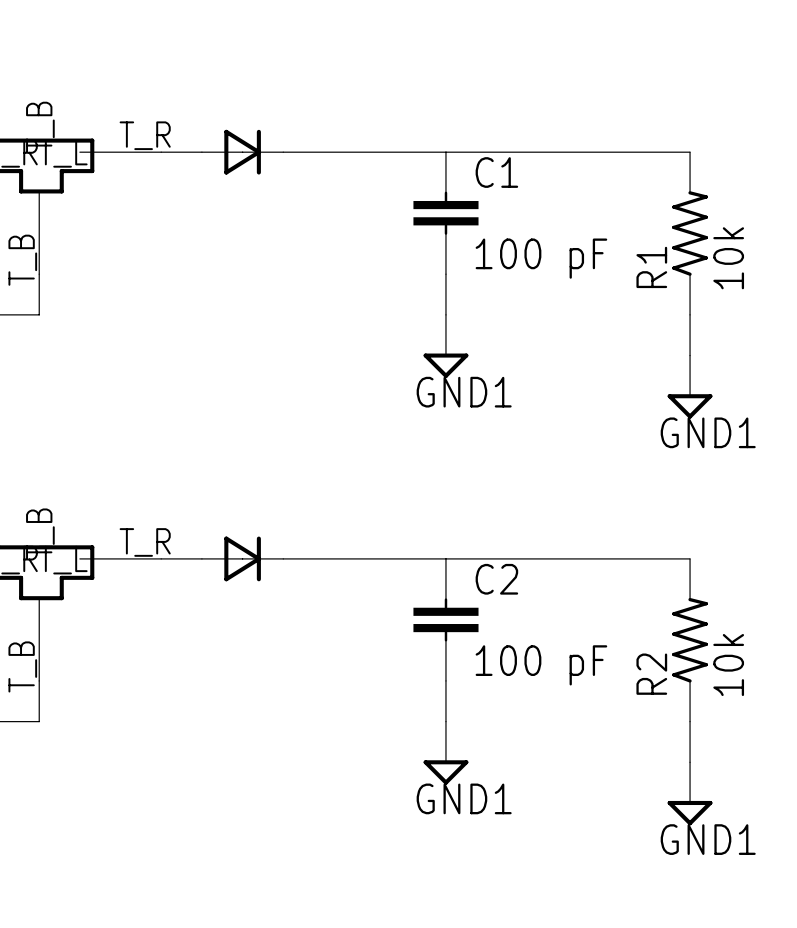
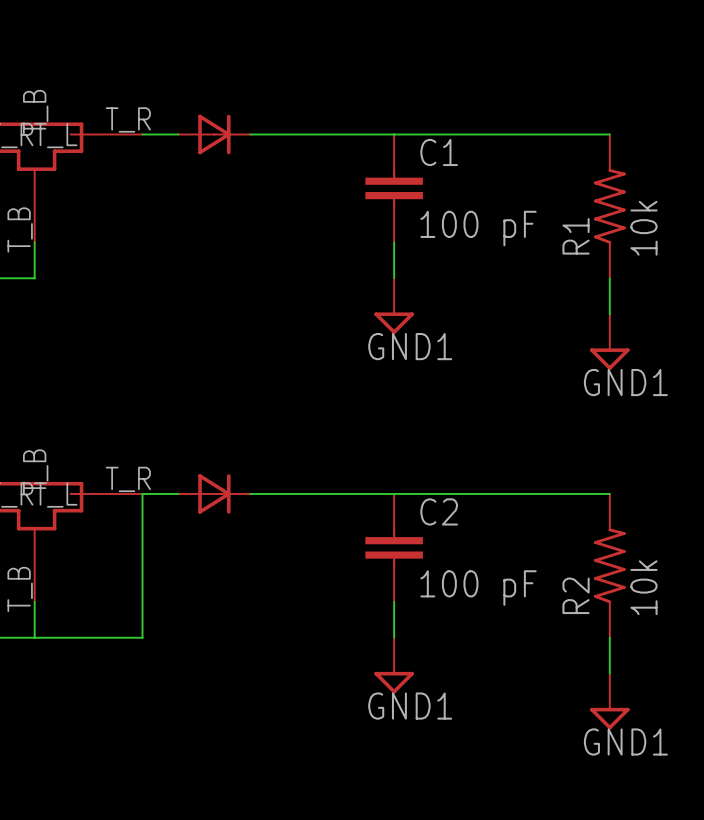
wire: none -> (142, 493) (142, 637) (34, 637)

